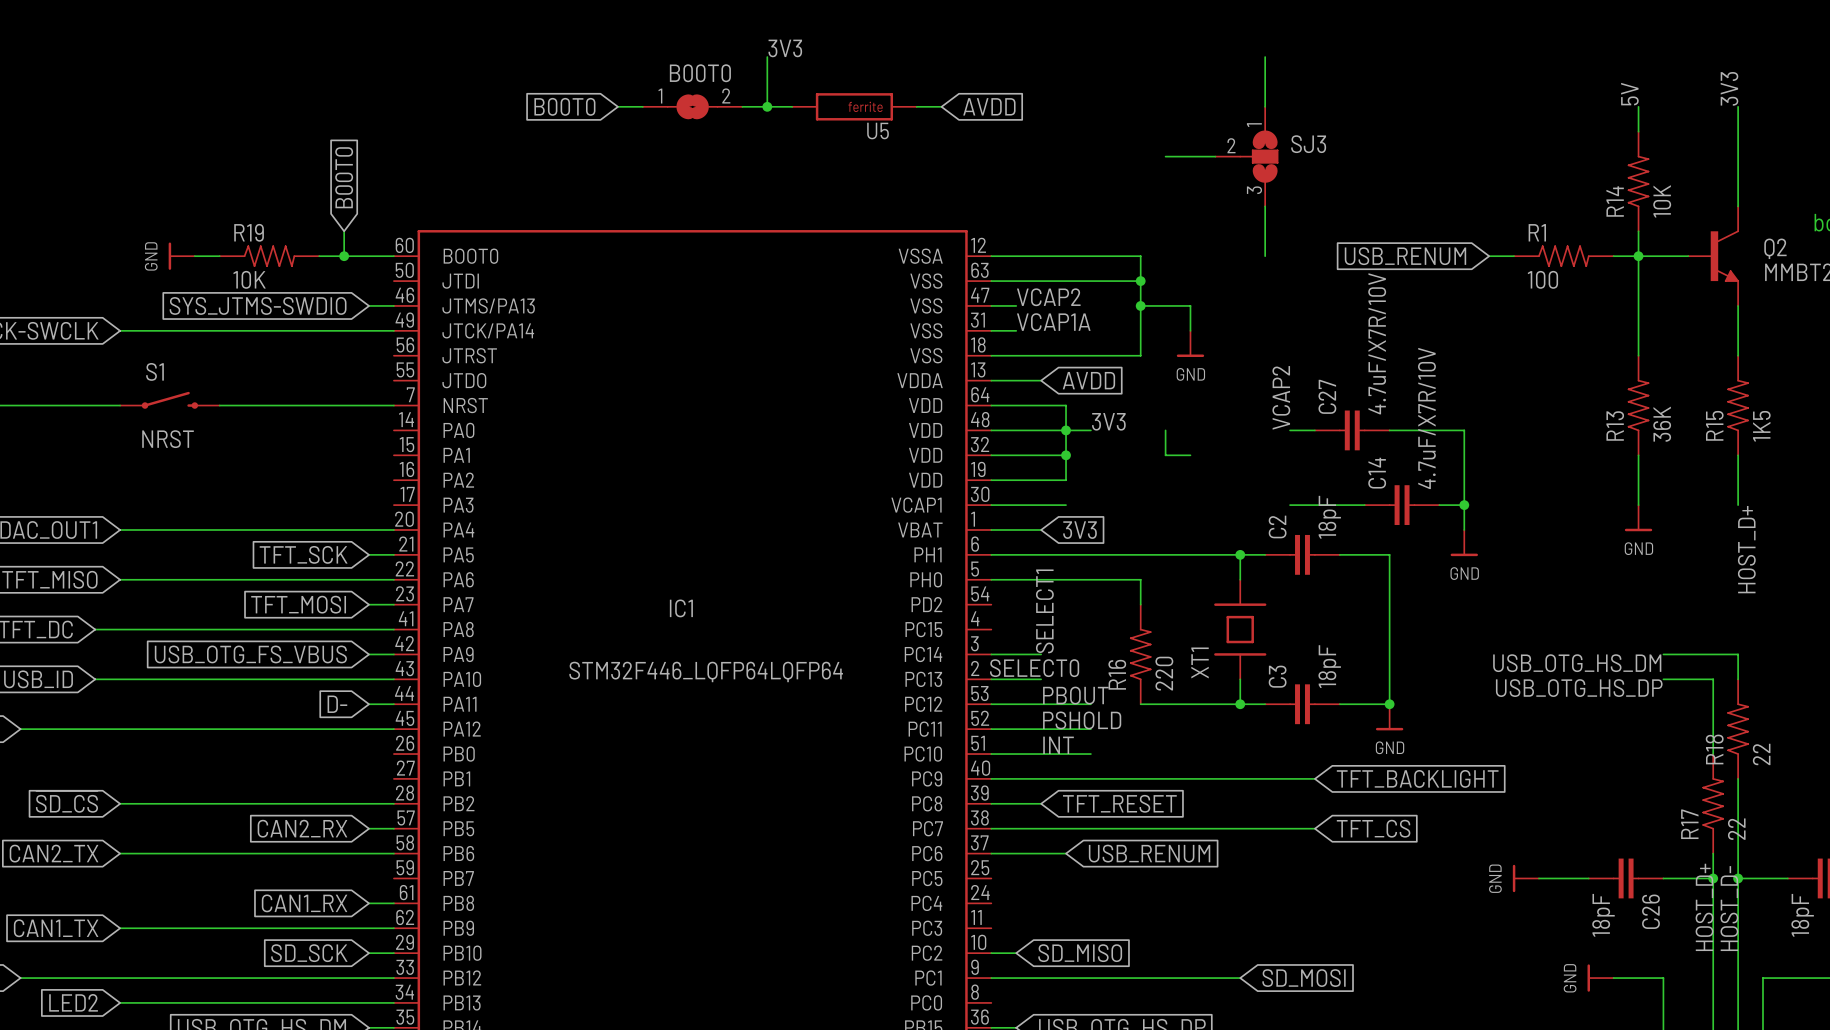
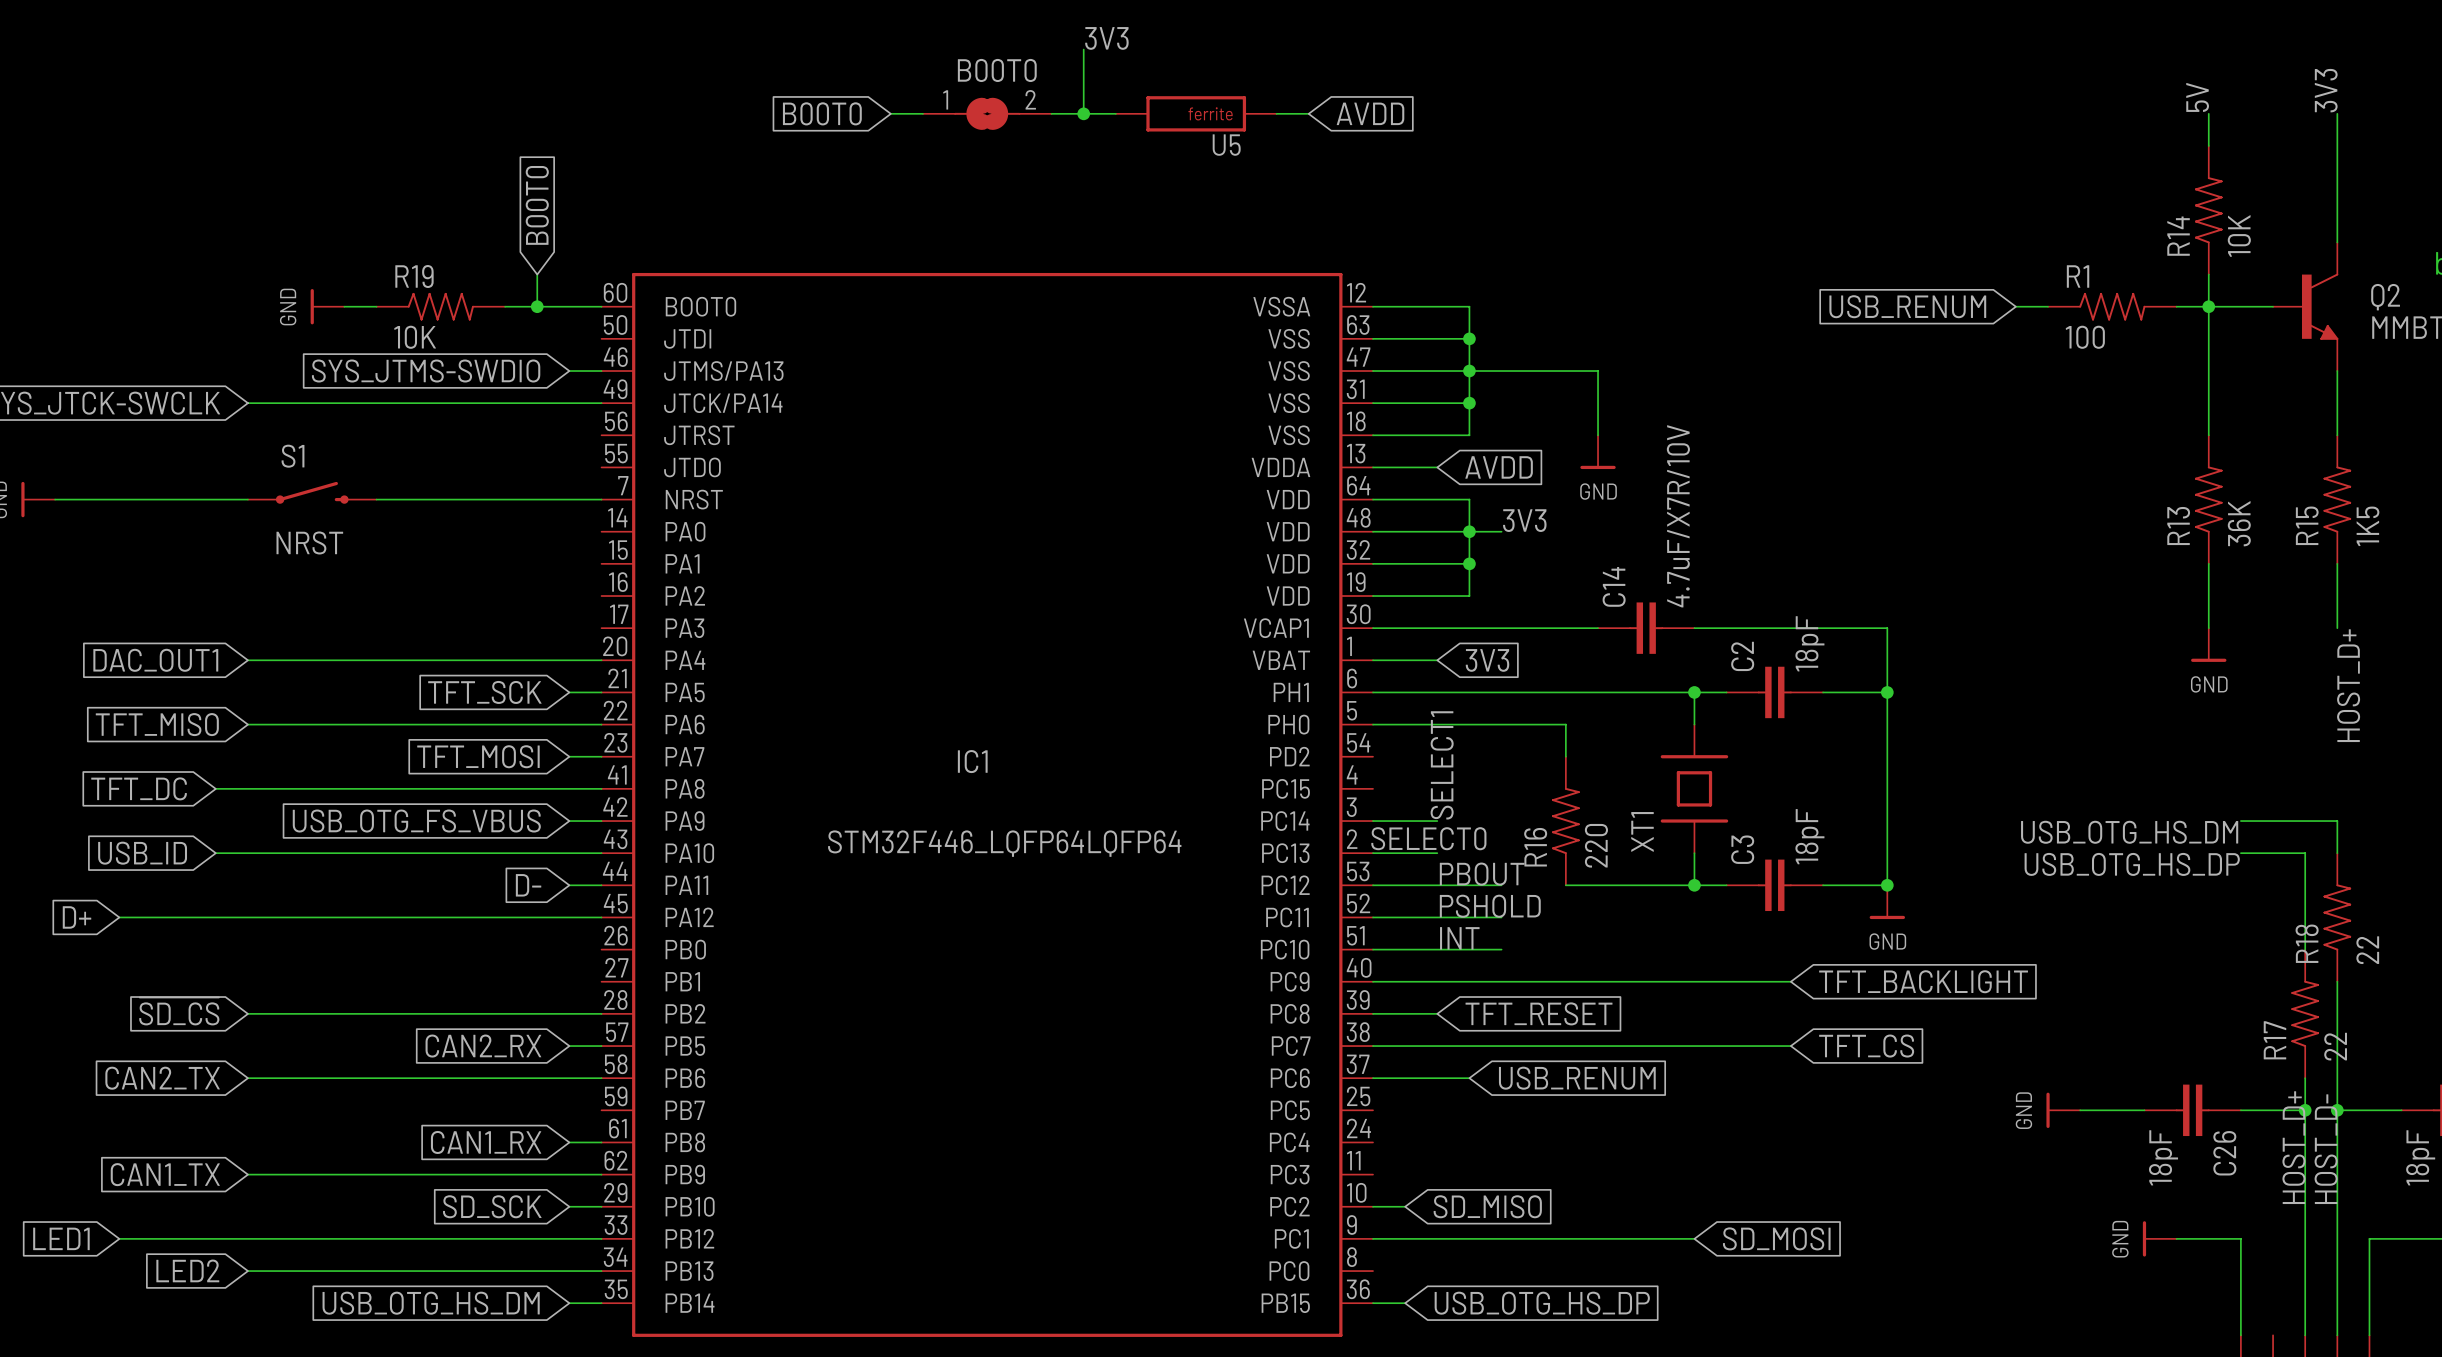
wire: (1265, 57) (1265, 106) -> none
wire: (1165, 156) (1215, 156) -> (1405, 403) (1469, 403)
SJ3: (1246, 156) -> none
wire: (1265, 206) (1265, 256) -> none
wire: (1066, 256) (1140, 256) (1140, 355) (1066, 355) -> (1469, 306) (1469, 435)
wire: (1066, 281) (1140, 281) -> none
junction: none -> (1469, 338)
junction: (1140, 281) -> none
label: VCAP2 (1048, 297) -> none
wire: none -> (1405, 371) (1565, 371)
junction: none -> (1469, 371)
junction: (1140, 305) -> none
wire: (1165, 305) (1190, 305) (1190, 330) -> (1598, 371) (1598, 435)
label: VCAP1A (1053, 322) -> none
junction: none -> (1469, 403)
power symbol position: GND (1190, 343) -> GND (1598, 452)
label: VCAP2 (1281, 397) -> none
wire: (1165, 430) (1165, 455) (1190, 455) -> none
wire: (1290, 430) (1314, 430) -> none
C27: 4.7uF/X7R/10V (1352, 430) -> none
wire: (1389, 430) (1464, 430) (1464, 529) -> none
wire: none -> (1469, 628) (1598, 628)
wire: none -> (1694, 628) (1758, 628)
wire: none -> (1855, 628) (1887, 628) (1887, 692)
C14 position: (1402, 505) -> (1646, 628)
wire: (1439, 505) (1464, 505) -> none
junction: (1464, 505) -> none
power symbol: GND (1464, 543) -> none
junction: none -> (1887, 692)

